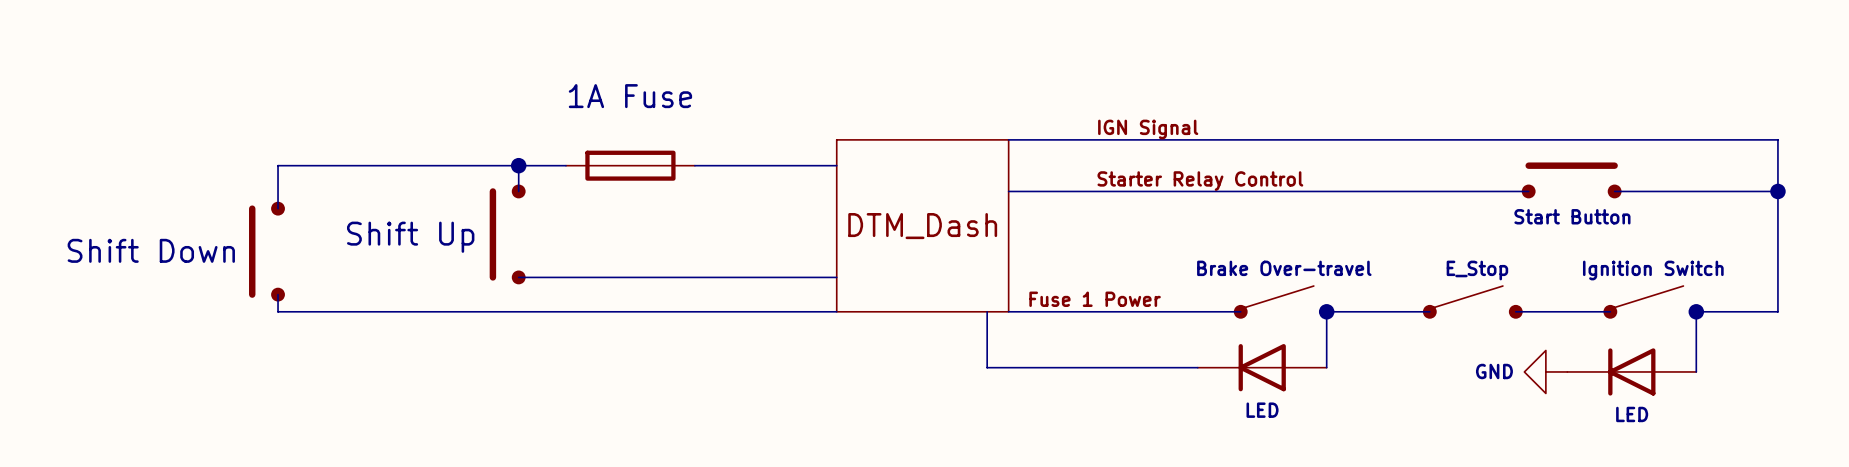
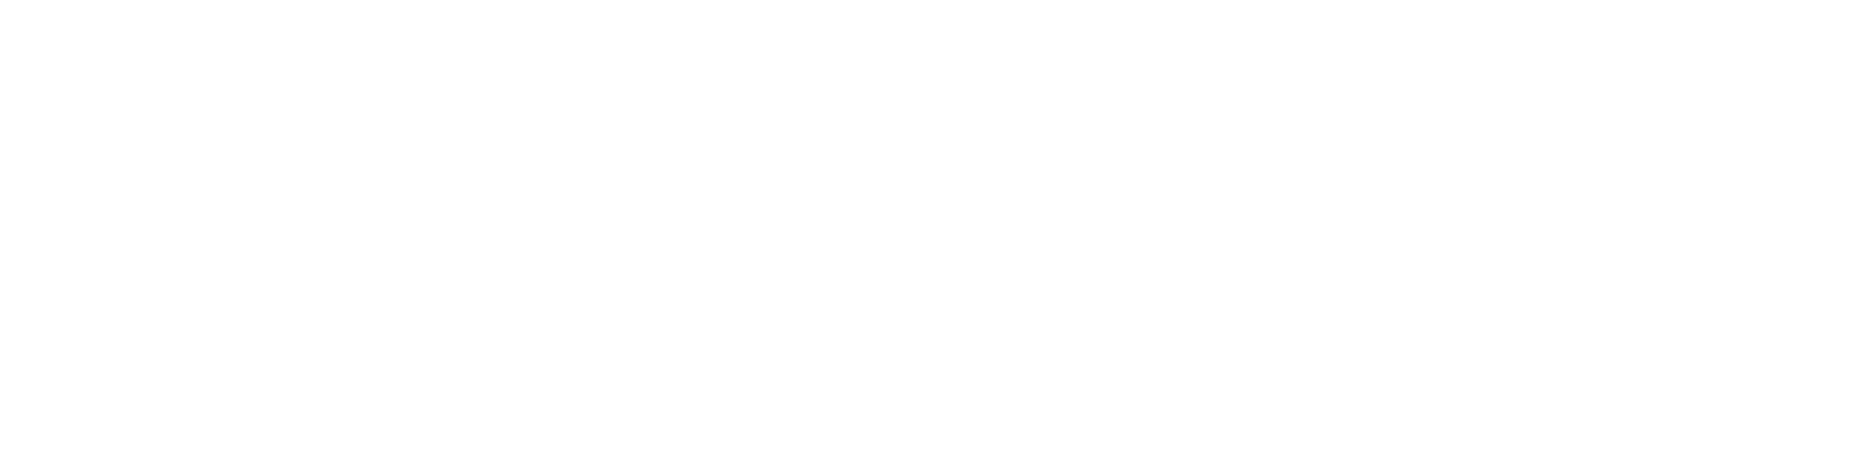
label: IGN Signal (1148, 129) -> none
wire: (1008, 139) (1777, 139) (1777, 311) (1696, 311) (1696, 371) -> none
wire: (518, 165) (518, 191) -> none
junction: (518, 165) -> none
wire: (565, 165) (278, 165) (278, 208) -> none
part: 1A Fuse (630, 165) -> none
wire: (694, 165) (836, 165) -> none
part: Start Button (1571, 180) -> none
label: Starter Relay Control (1200, 181) -> none
wire: (1008, 191) (1528, 191) -> none
wire: (1614, 191) (1777, 191) -> none
junction: (1777, 191) -> none
part: (922, 225) -> none
part: Shift Up (507, 234) -> none
part: Shift Down (266, 251) -> none
wire: (518, 277) (836, 277) -> none
wire: (278, 294) (278, 311) (836, 311) -> none
label: Fuse 1 Power (1095, 299) -> none
part: Brake Over-travel (1283, 301) -> none
part: E_Stop (1472, 301) -> none
part: Ignition Switch (1653, 301) -> none
wire: (987, 311) (987, 367) (1197, 367) -> none
wire: (1008, 311) (1240, 311) -> none
junction: (1326, 311) -> none
wire: (1429, 311) (1326, 311) (1326, 367) -> none
wire: (1515, 311) (1610, 311) -> none
junction: (1696, 311) -> none
part: LED (1262, 367) -> none
power symbol: GND (1545, 371) -> none
part: LED (1631, 371) -> none

